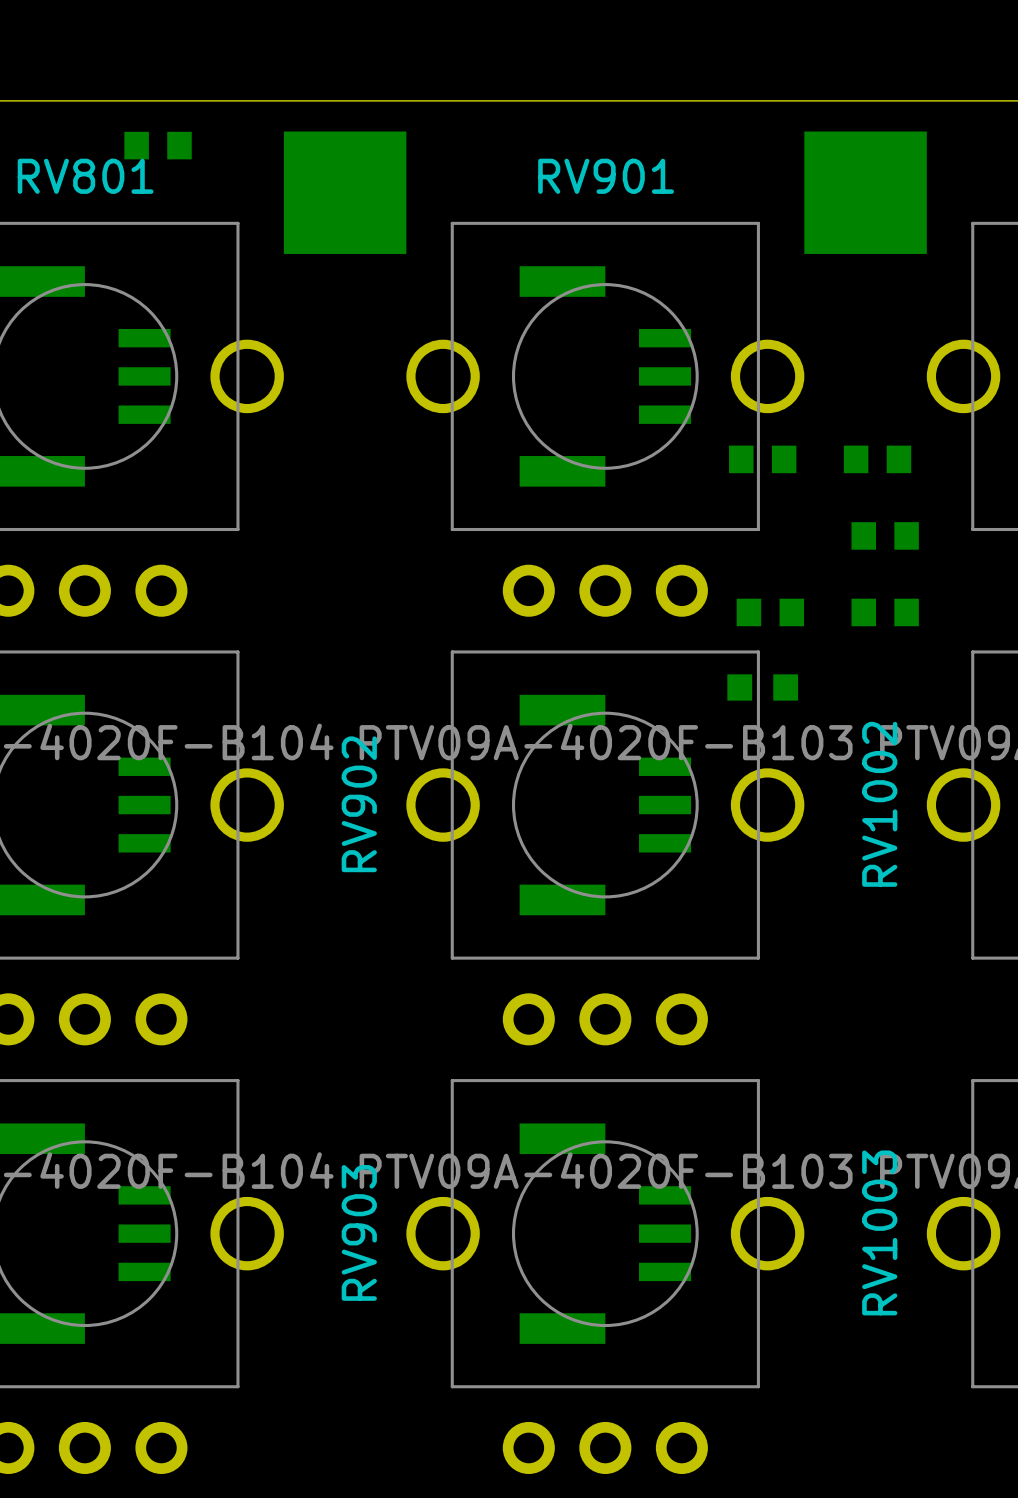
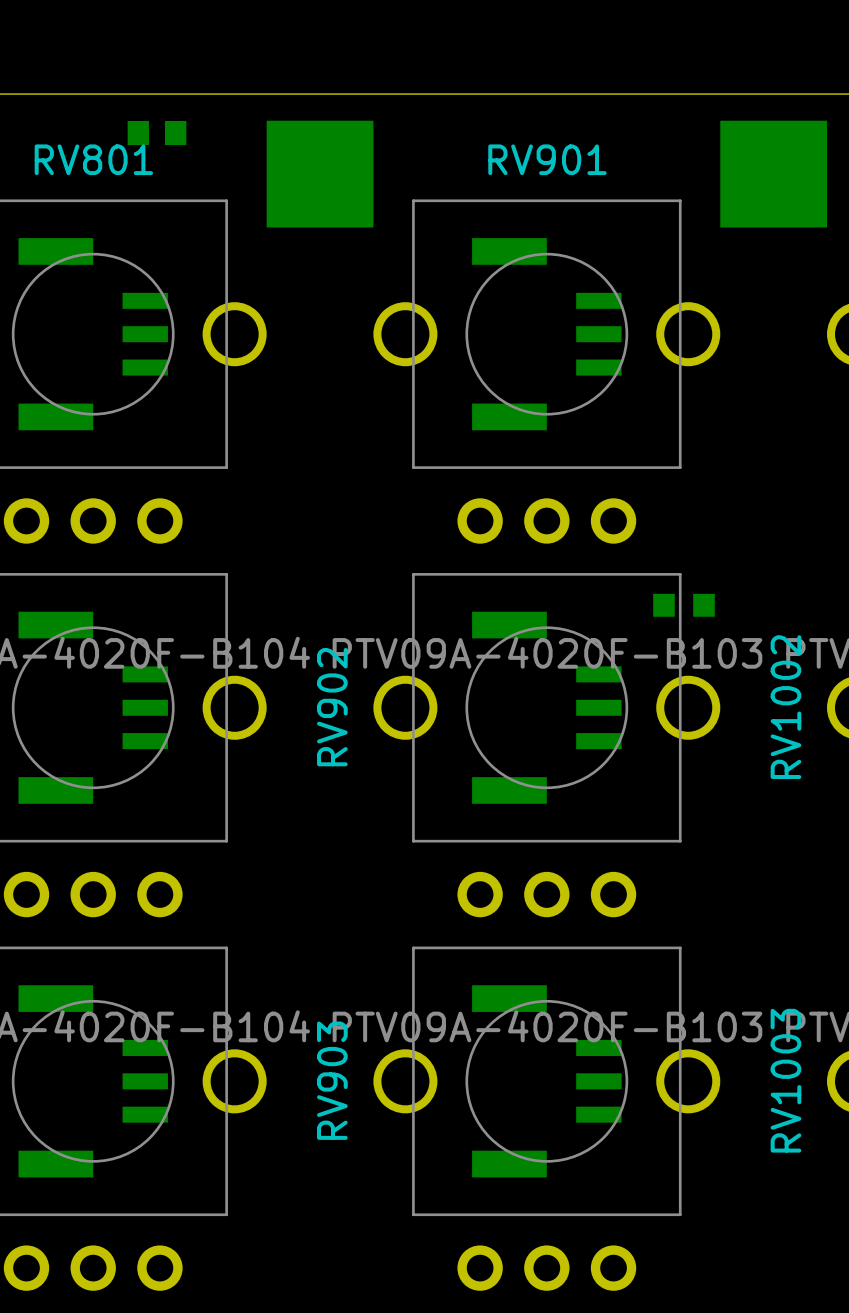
part: (762, 459) -> none
part: (877, 459) -> none
part: (885, 535) -> none
part: (770, 612) -> none
part: (885, 612) -> none

